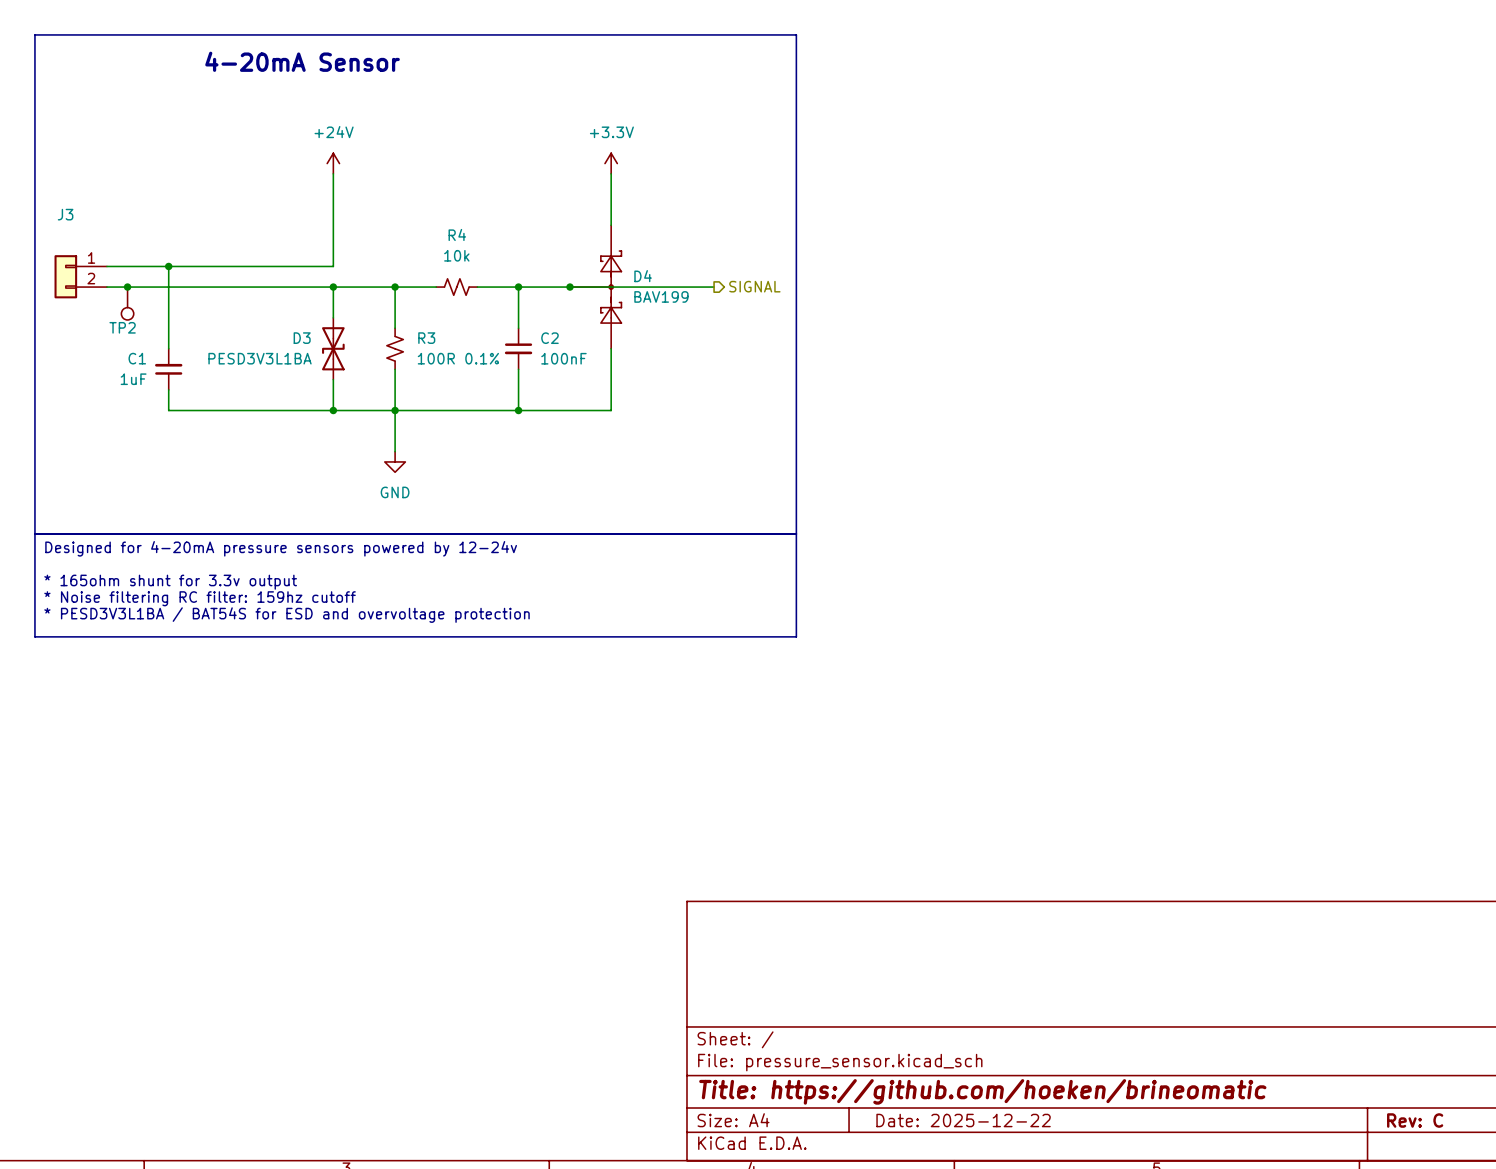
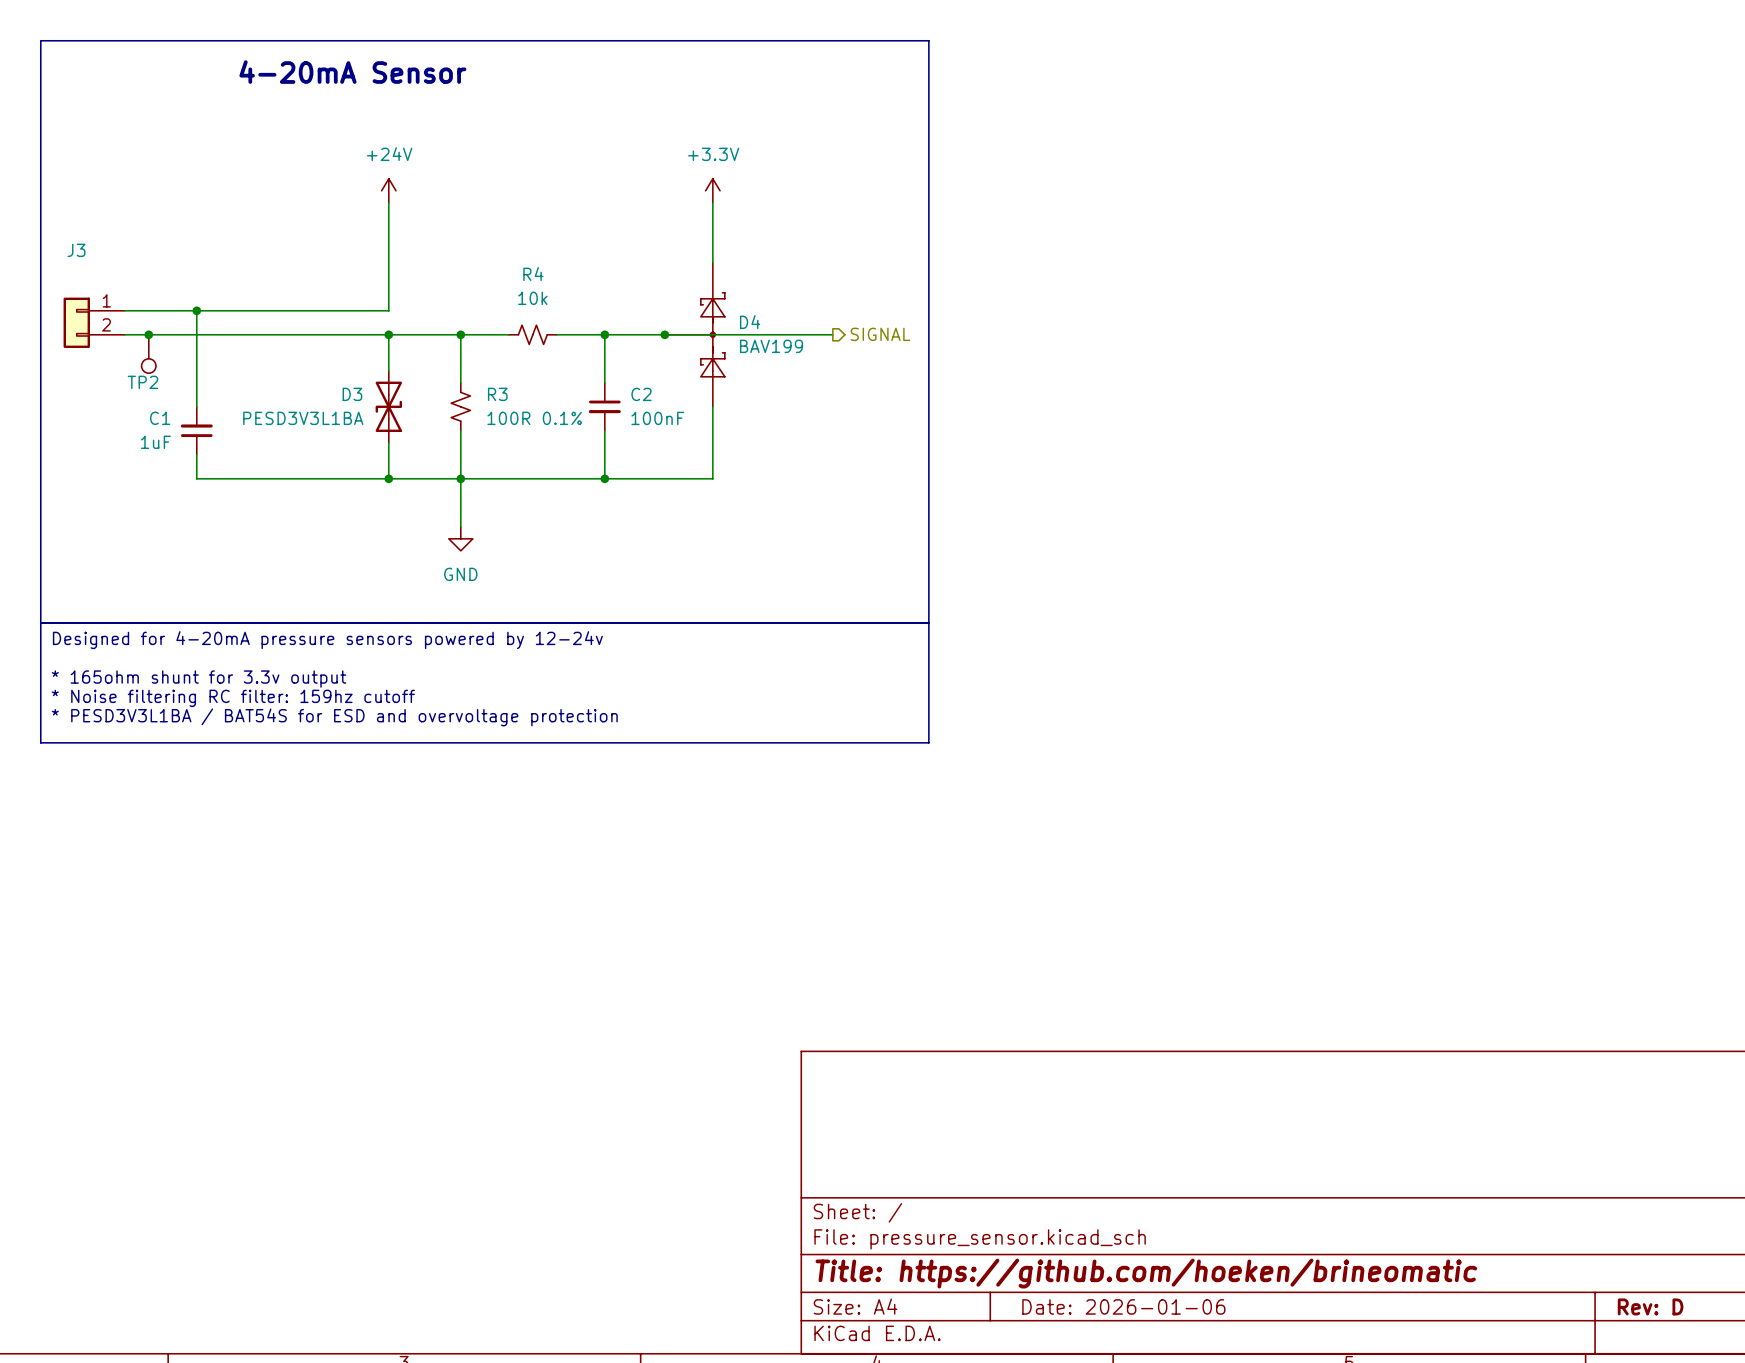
title block: Date: 2025-12-22 (963, 1120) -> Date: 2026-01-06 (1123, 1306)
title block: Rev: C (1415, 1120) -> Rev: D (1650, 1306)

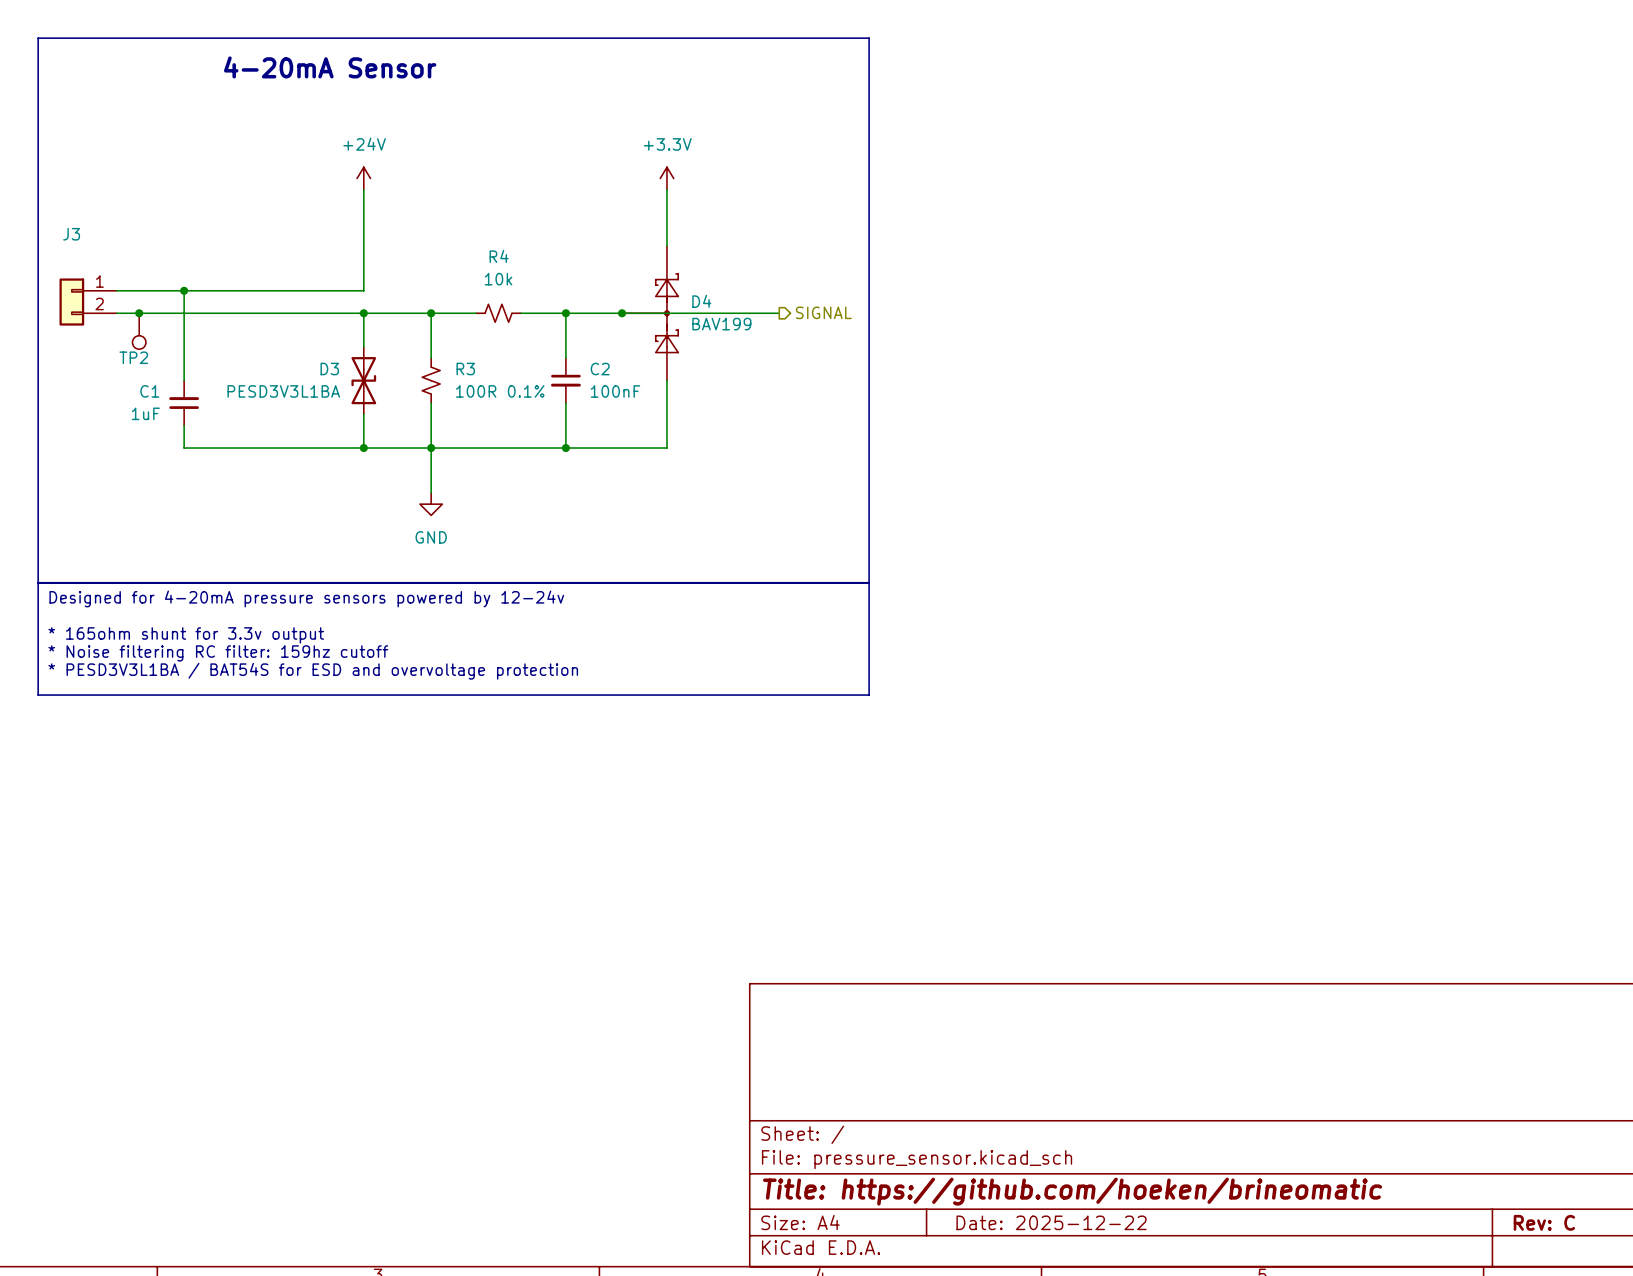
title block: Date: 2026-01-06 (1123, 1306) -> Date: 2025-12-22 (1051, 1222)
title block: Rev: D (1650, 1306) -> Rev: C (1544, 1222)

